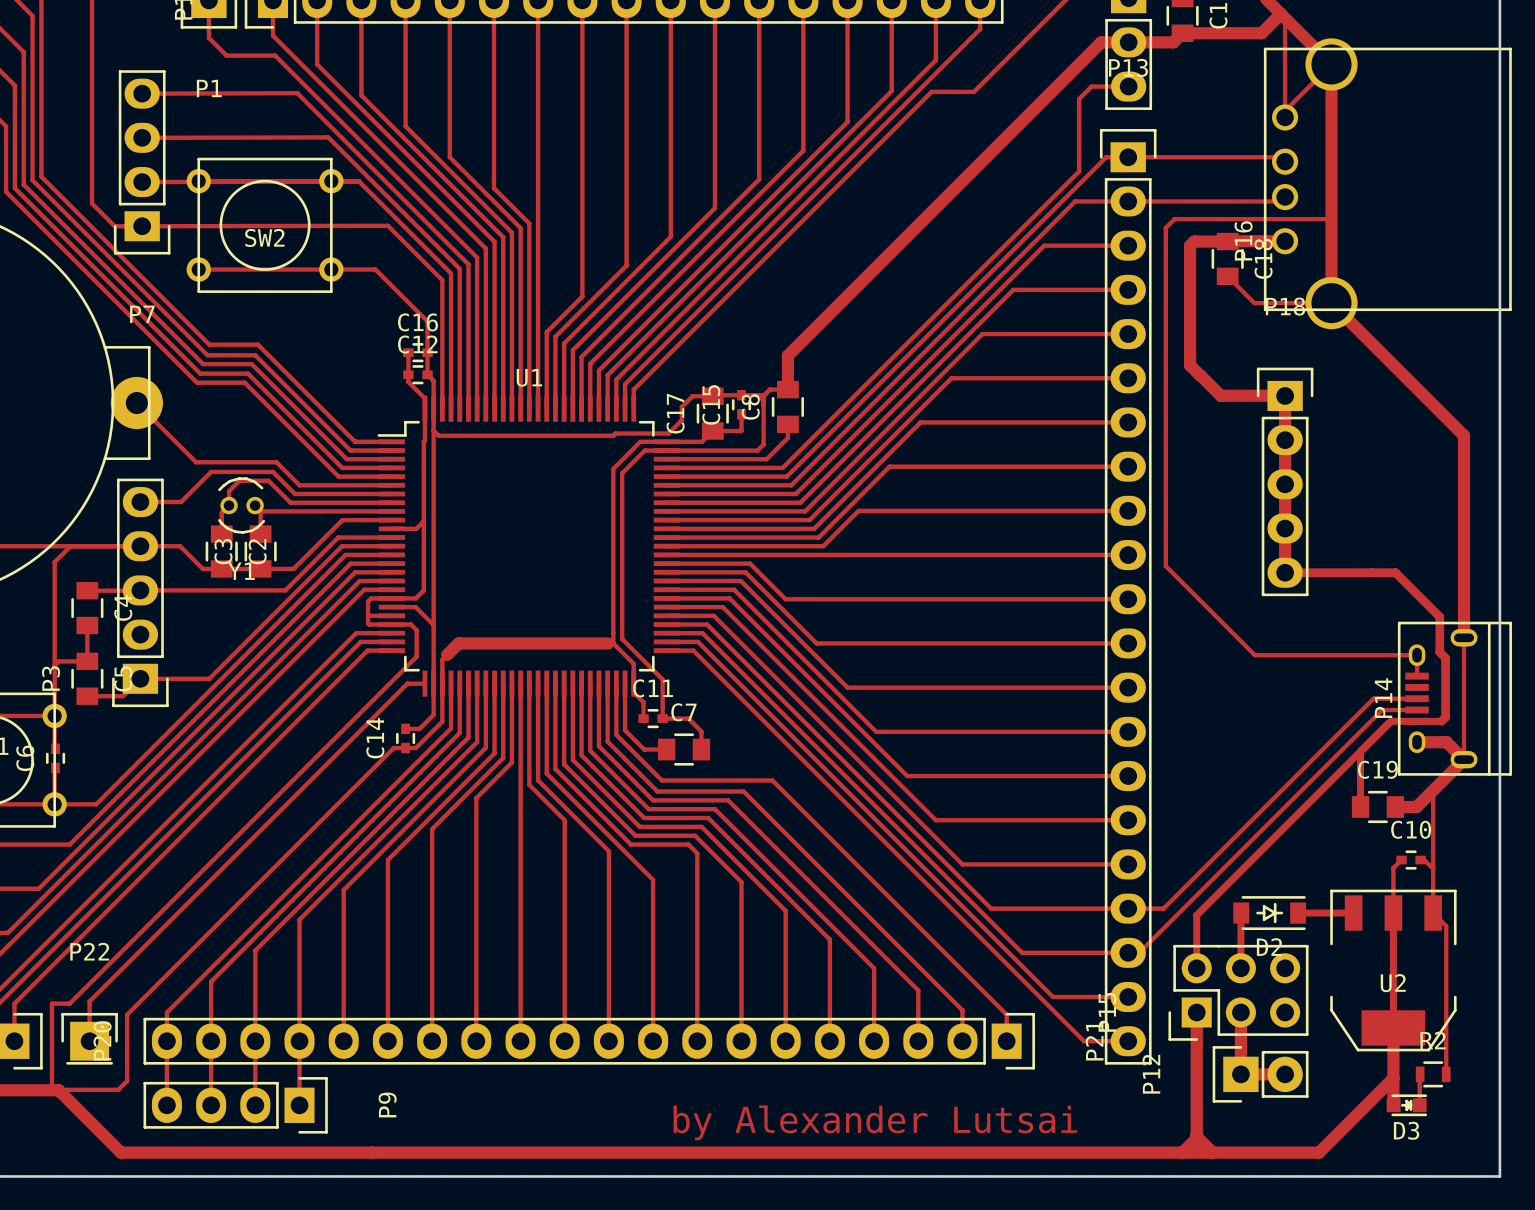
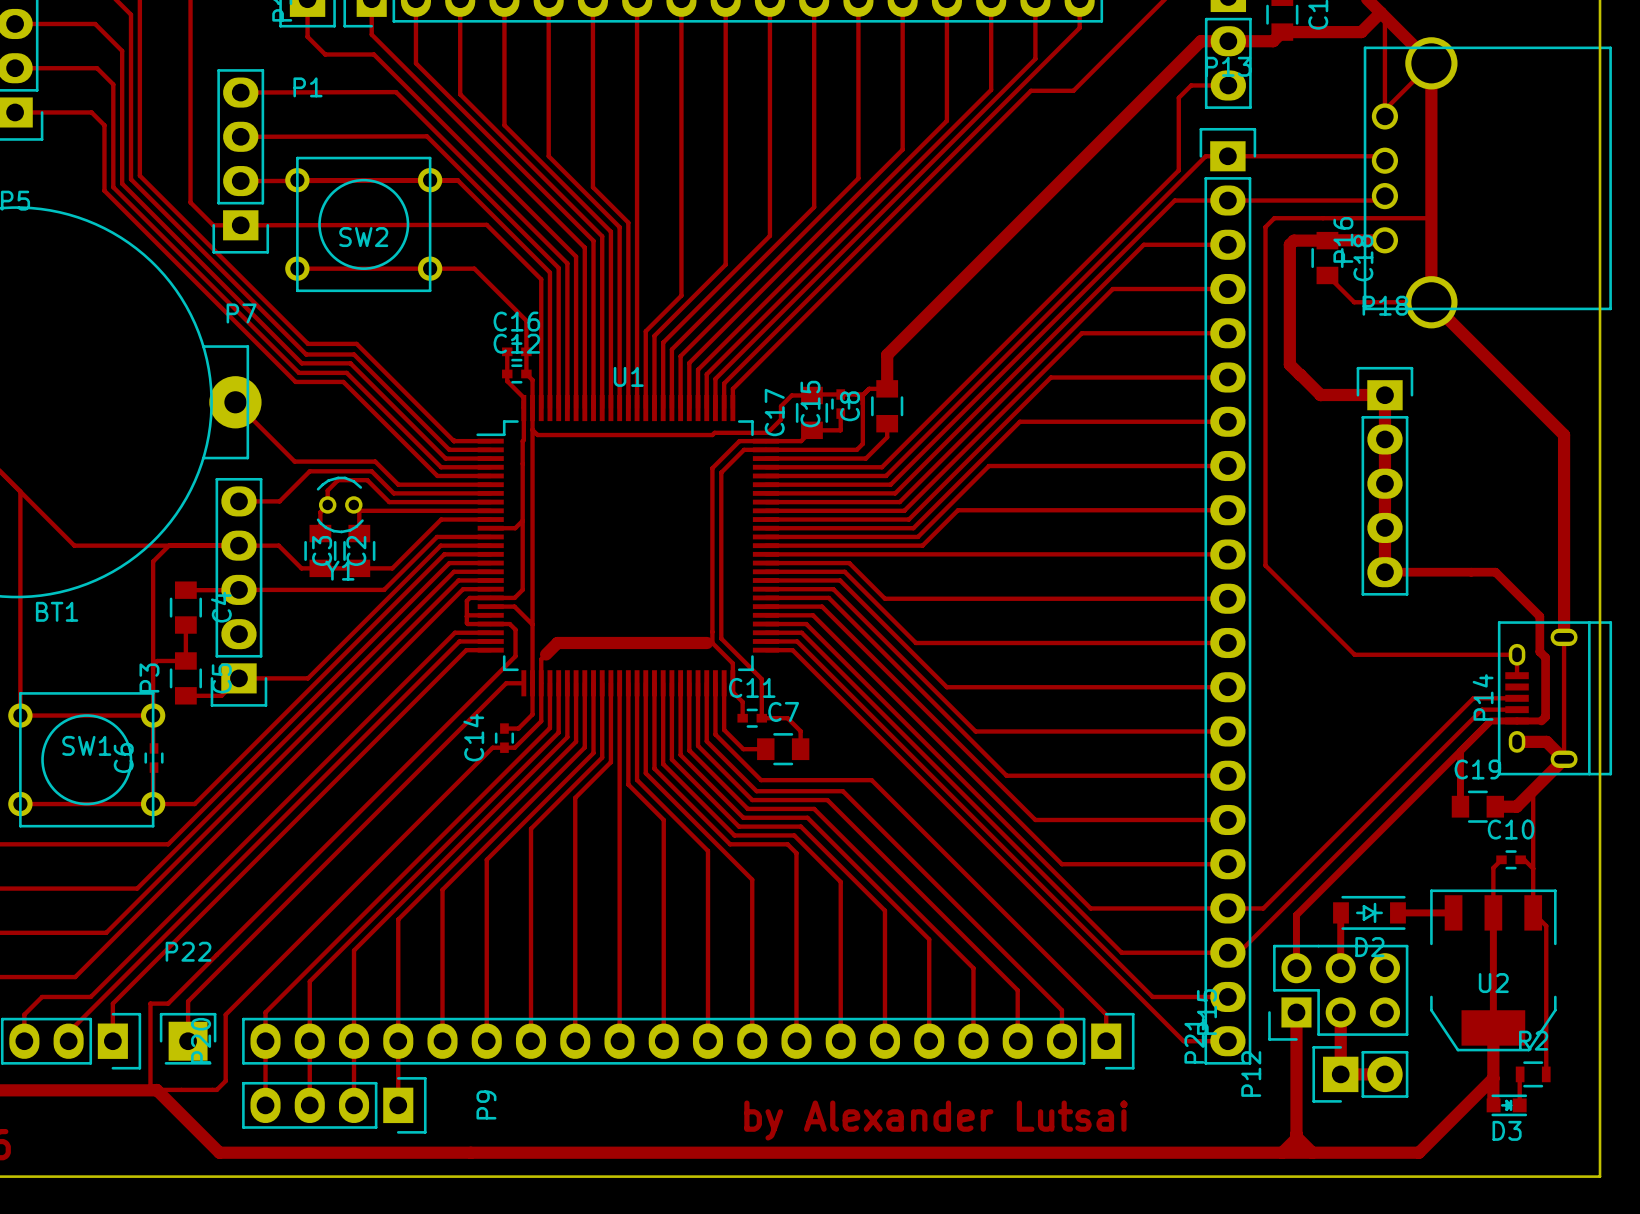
text position: by Alexander Lutsai (875, 1122) -> by Alexander Lutsai (936, 1120)

